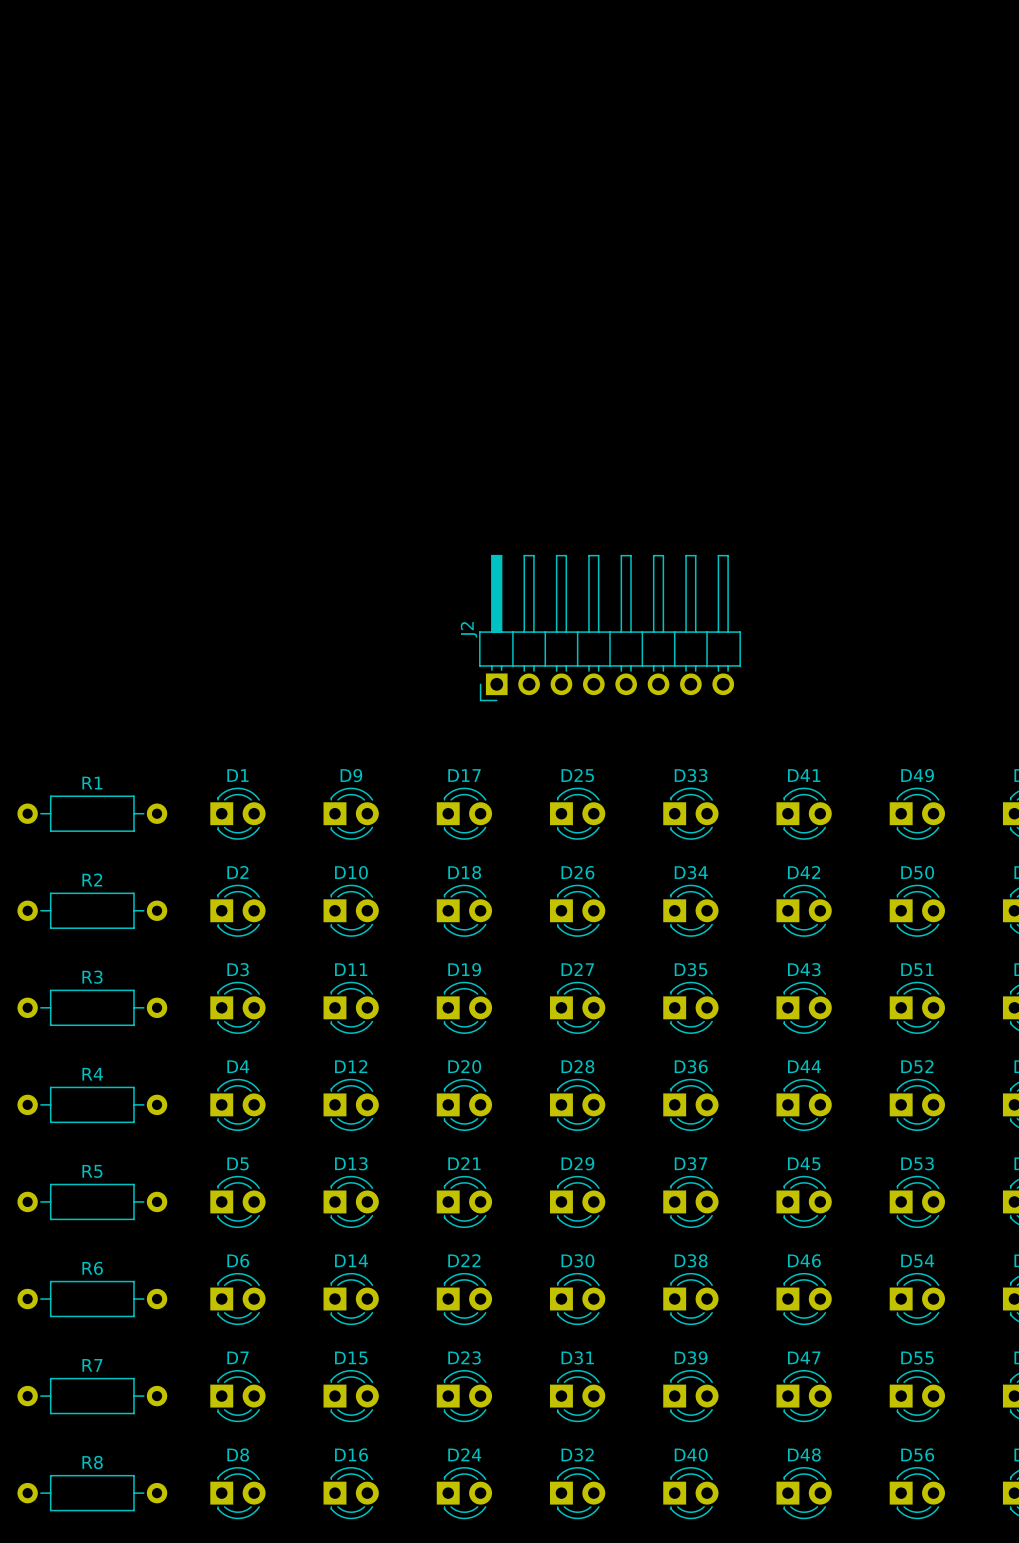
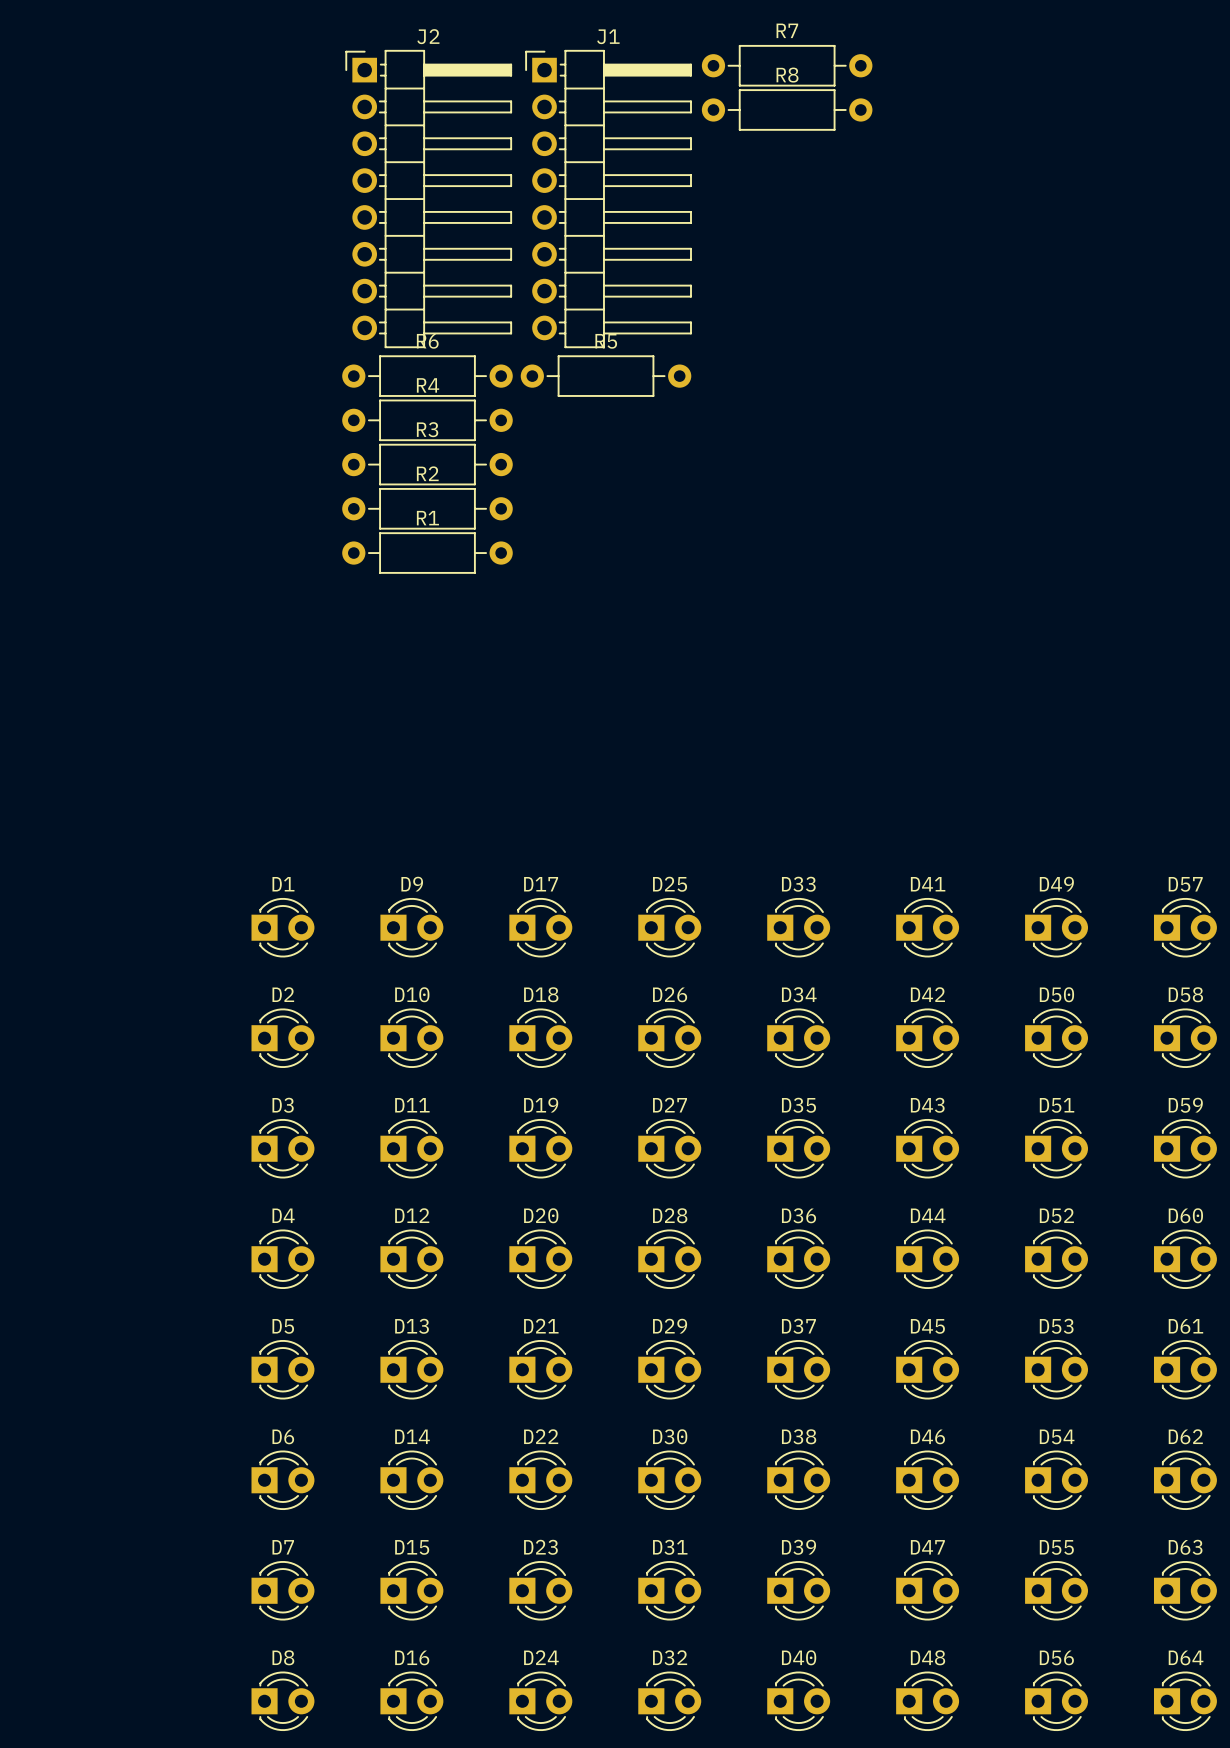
J1: none -> (608, 199)
J2 rotation: 0° (609, 628) -> 90° clockwise (428, 199)
J2 position: (609, 628) -> (428, 199)
R1 position: (92, 813) -> (427, 553)
R2 position: (92, 910) -> (427, 508)
R3 position: (92, 1007) -> (427, 464)
R4 position: (92, 1104) -> (427, 420)
R5 position: (92, 1201) -> (606, 376)
R6 position: (92, 1299) -> (427, 376)
R7 position: (92, 1396) -> (787, 65)
R8 position: (92, 1493) -> (787, 109)

